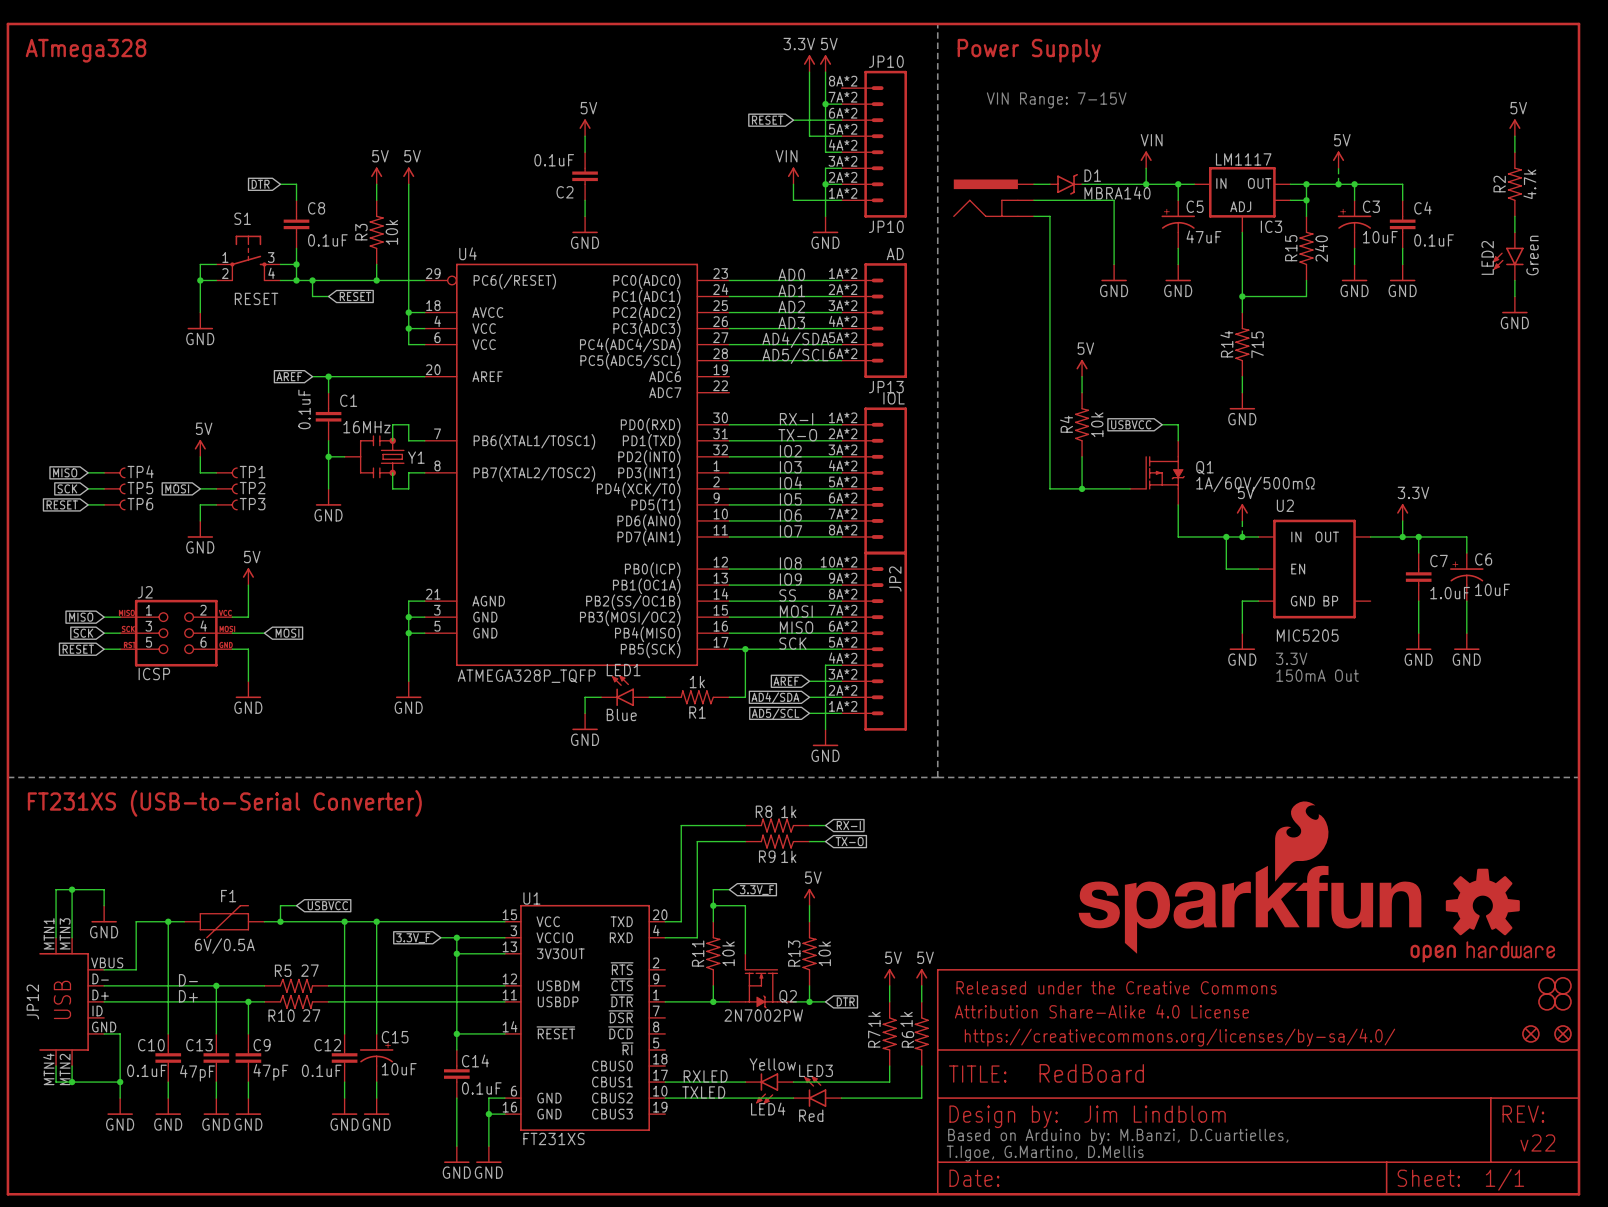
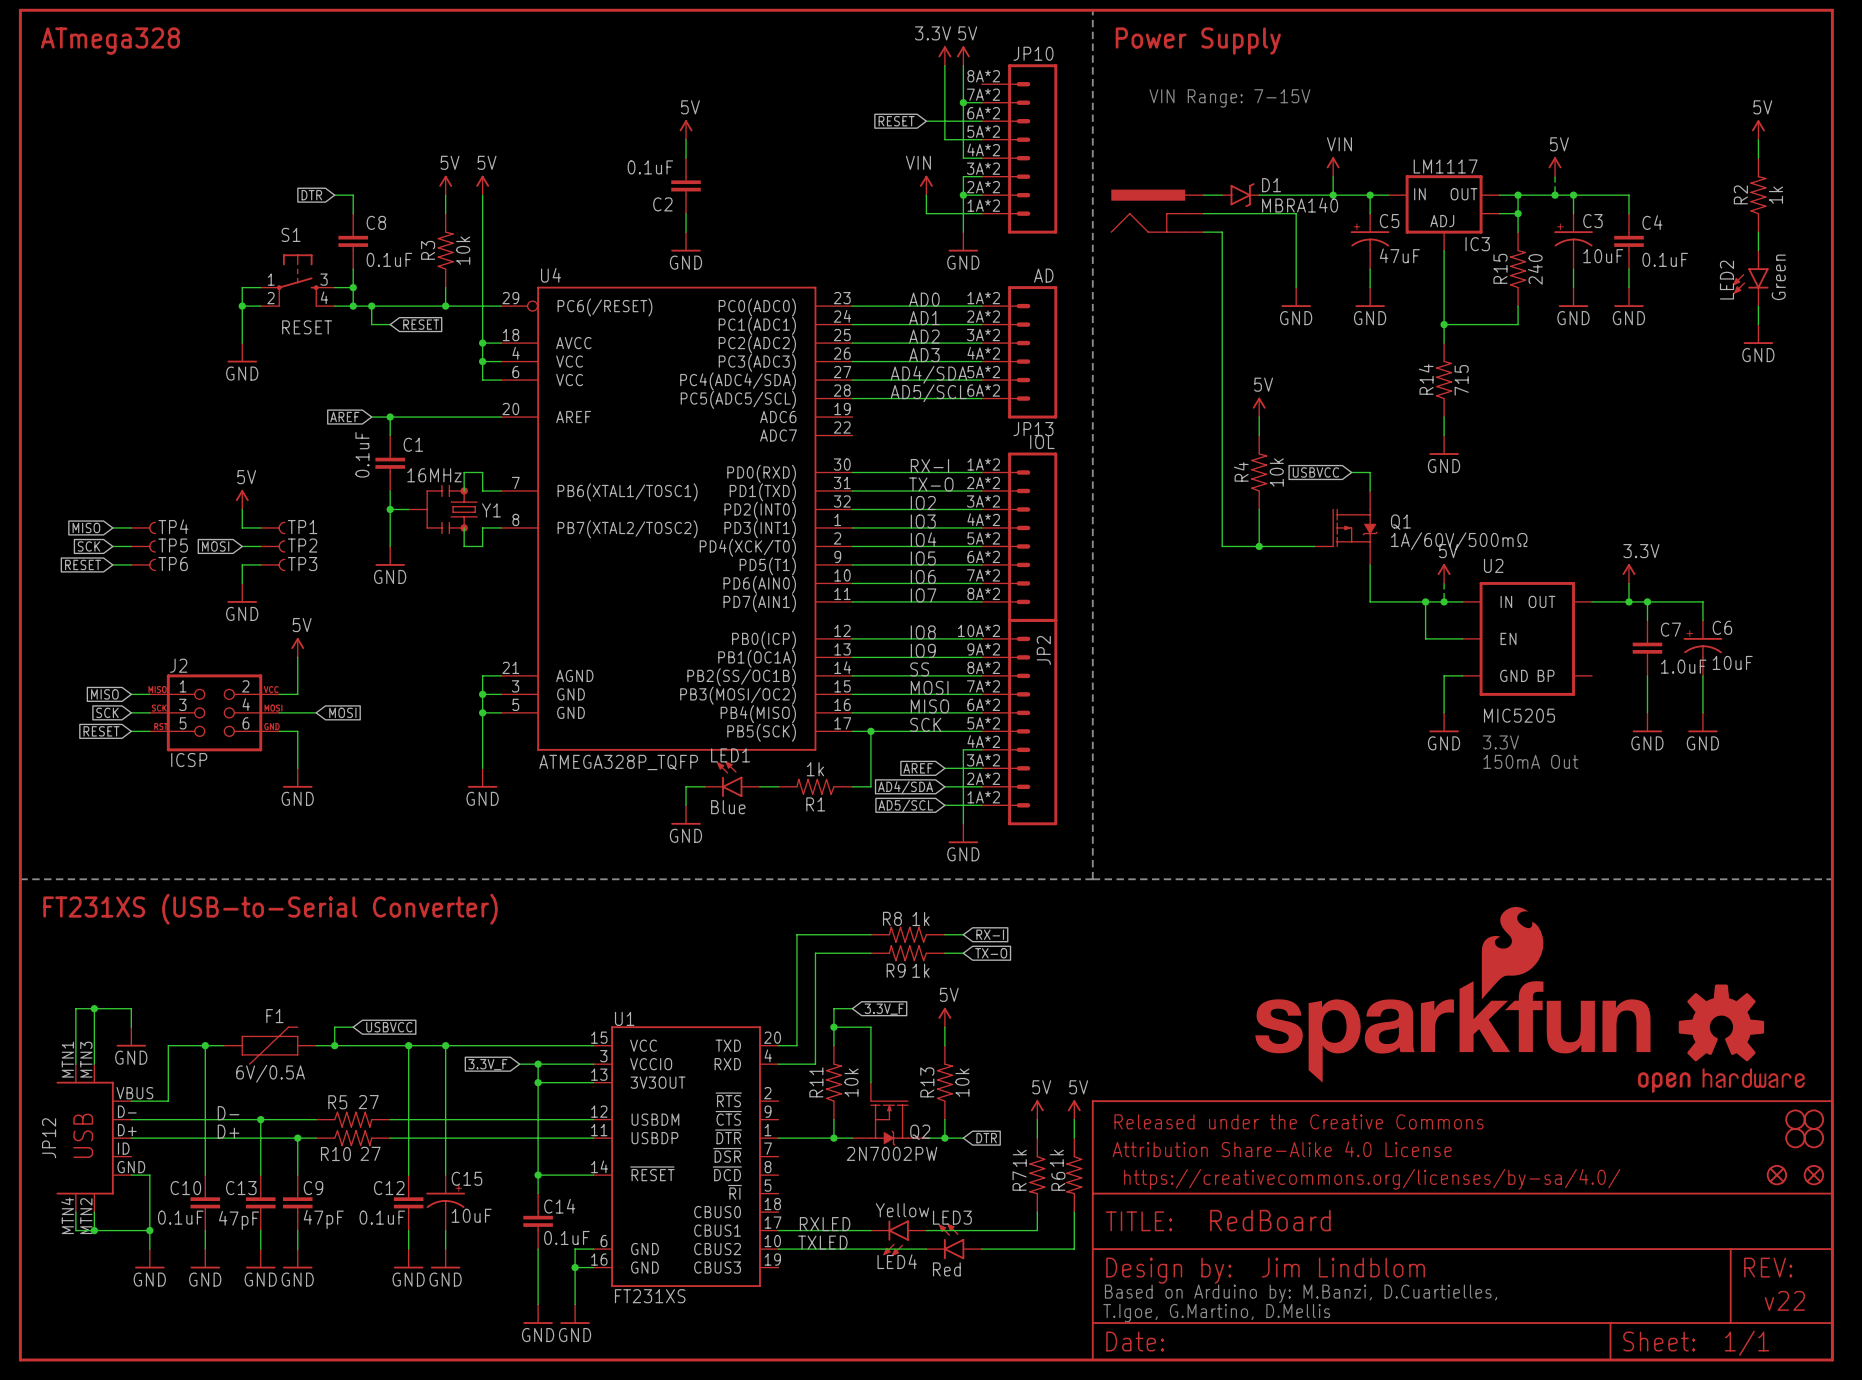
R2 value: 4.7k (1529, 184) -> 1k (1775, 195)
JP10 value: JP10 (886, 226) -> none

